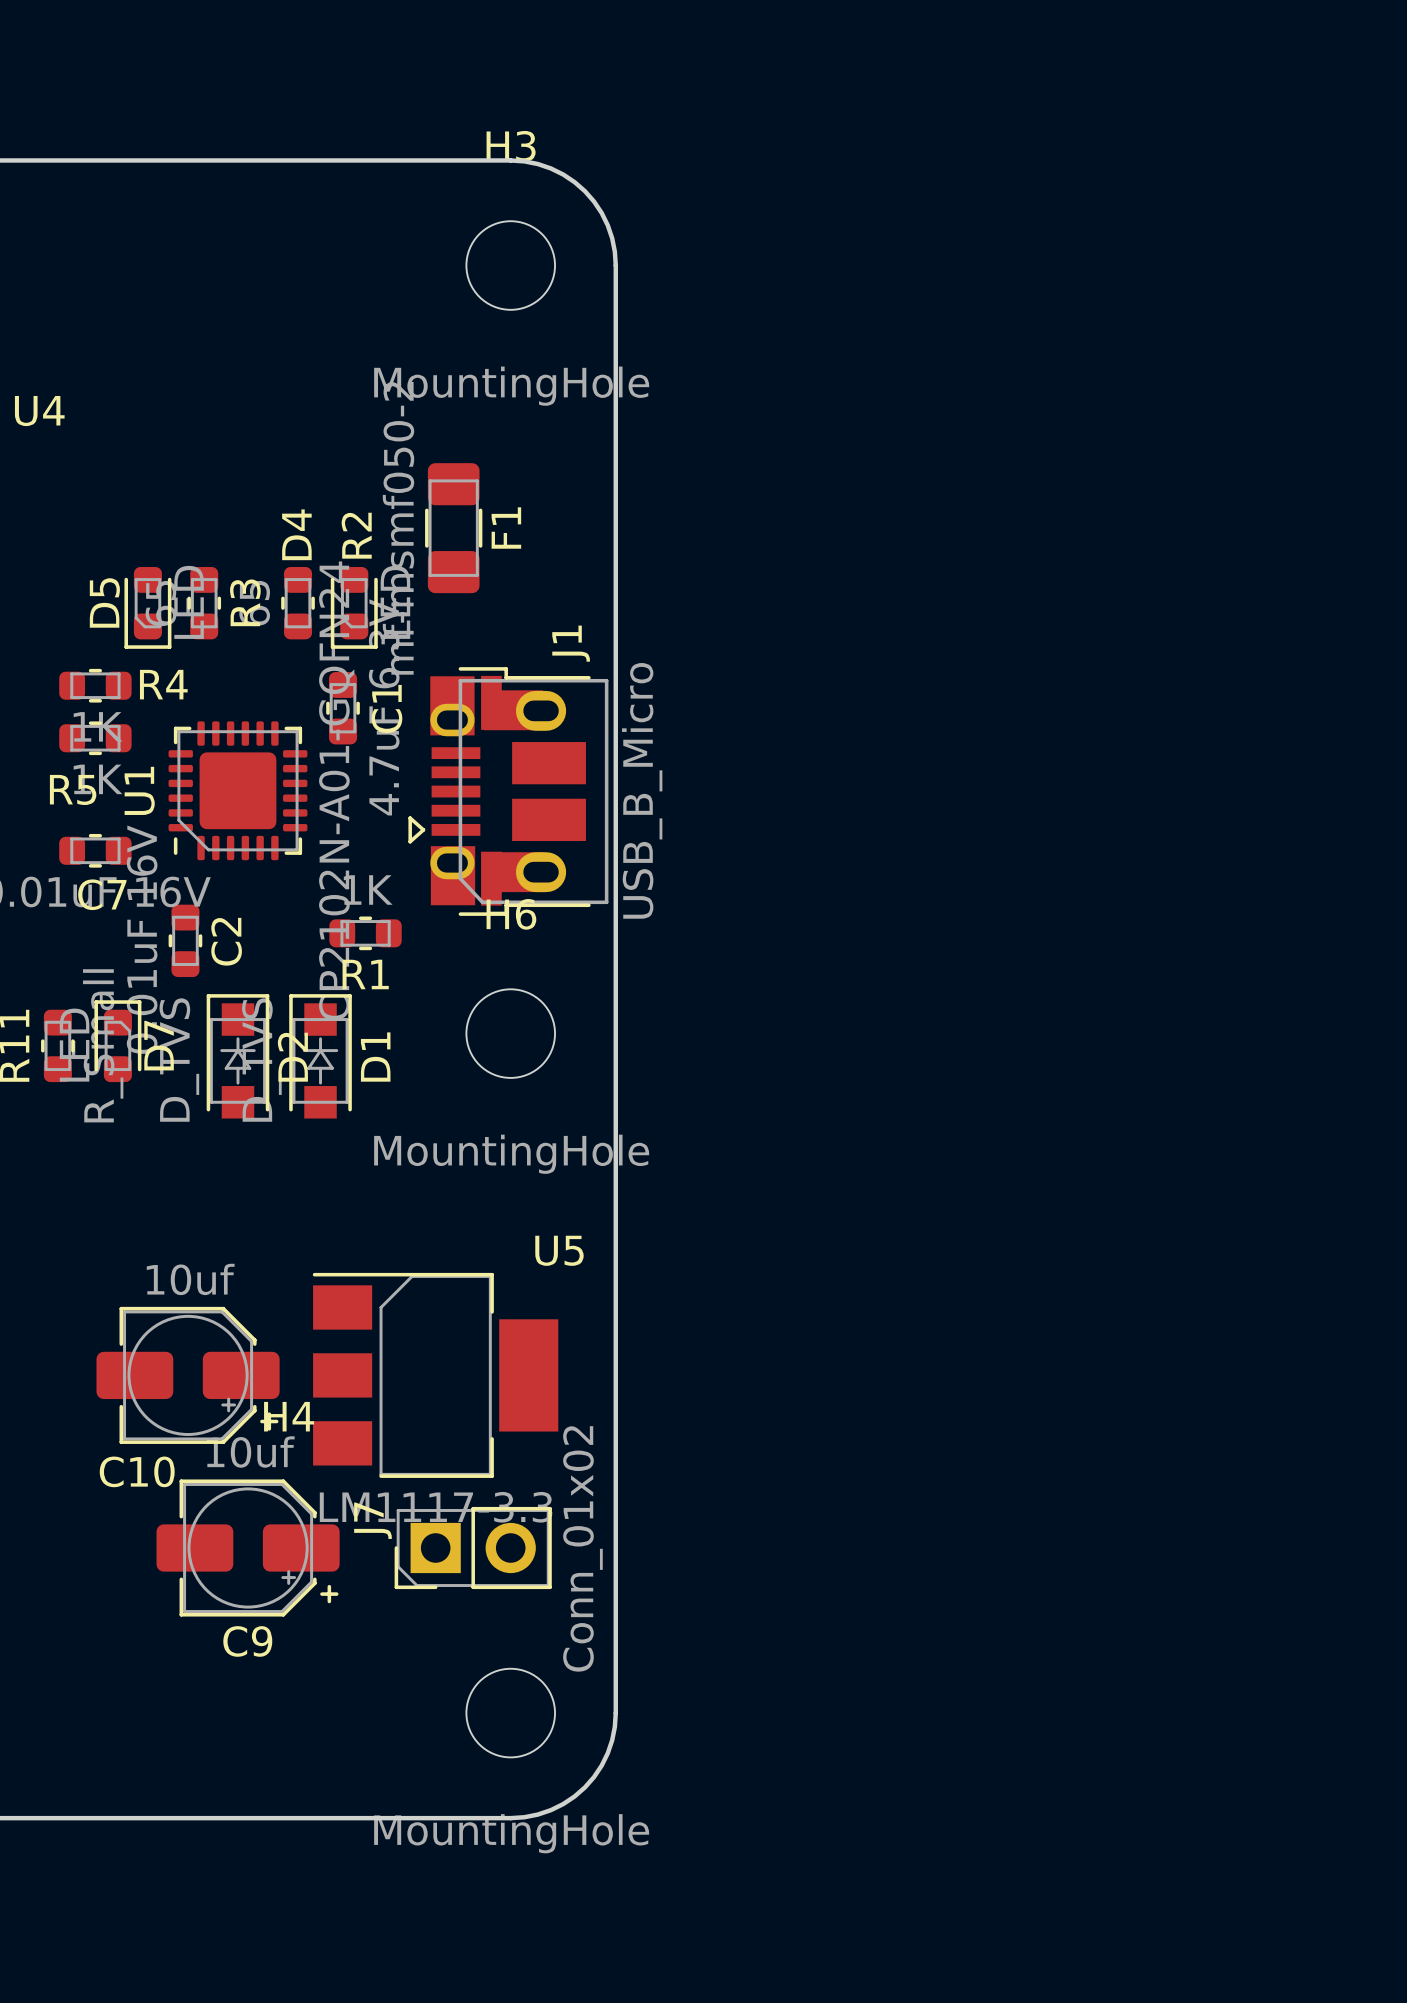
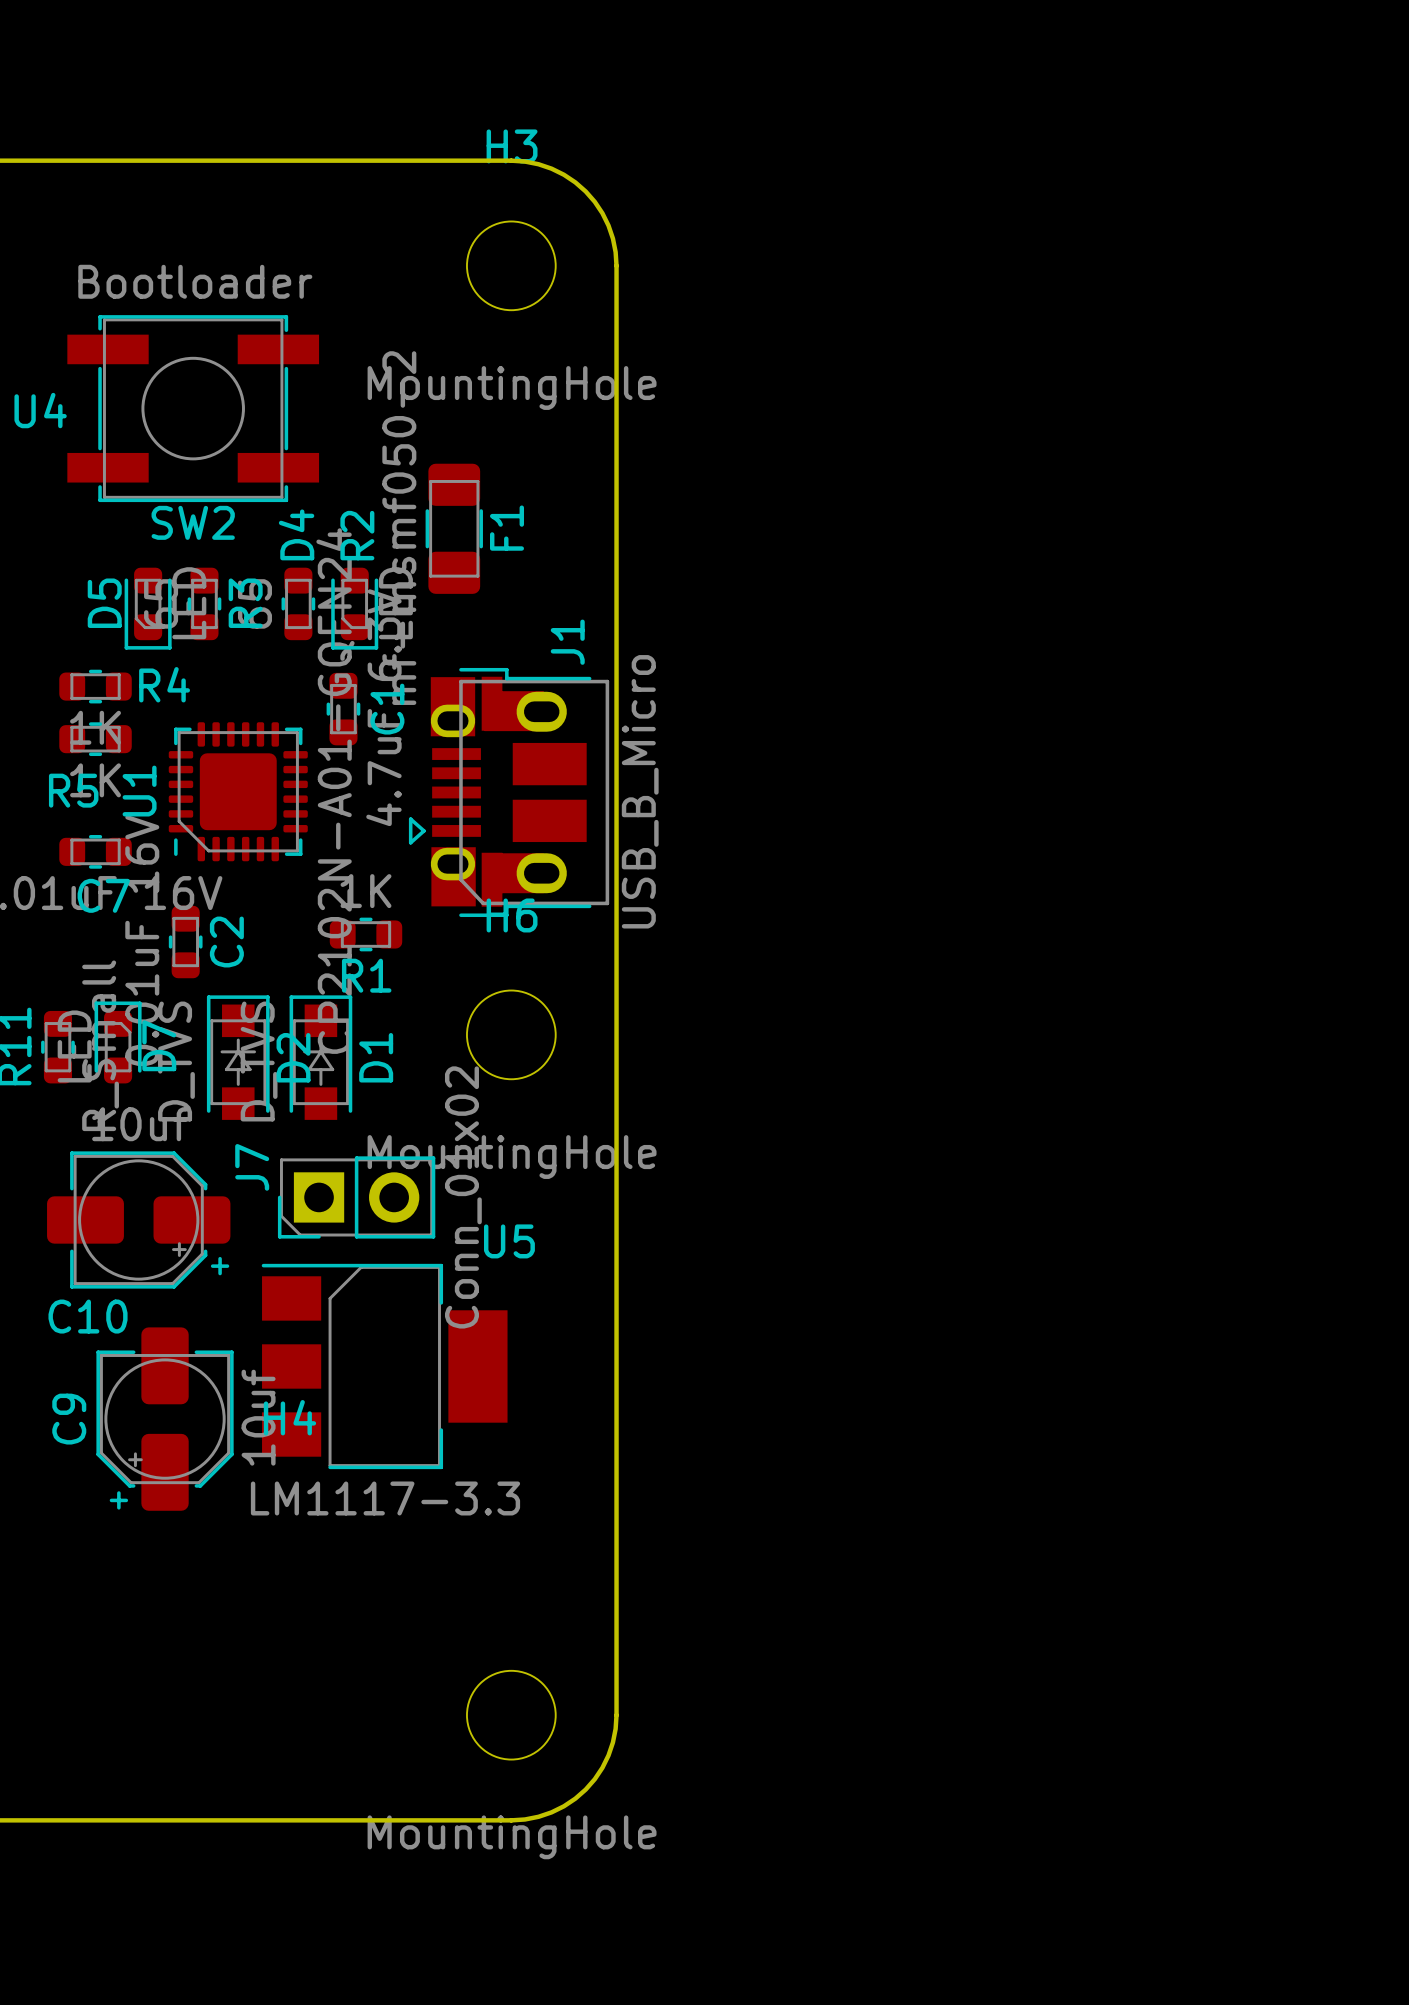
SW2: none -> Bootloader (193, 408)
C10 position: (188, 1375) -> (138, 1219)
U5 position: (435, 1375) -> (384, 1366)
C9 rotation: 0° (248, 1548) -> 90° clockwise (165, 1419)
C9 position: (248, 1548) -> (165, 1419)
J7 position: (473, 1548) -> (356, 1197)

